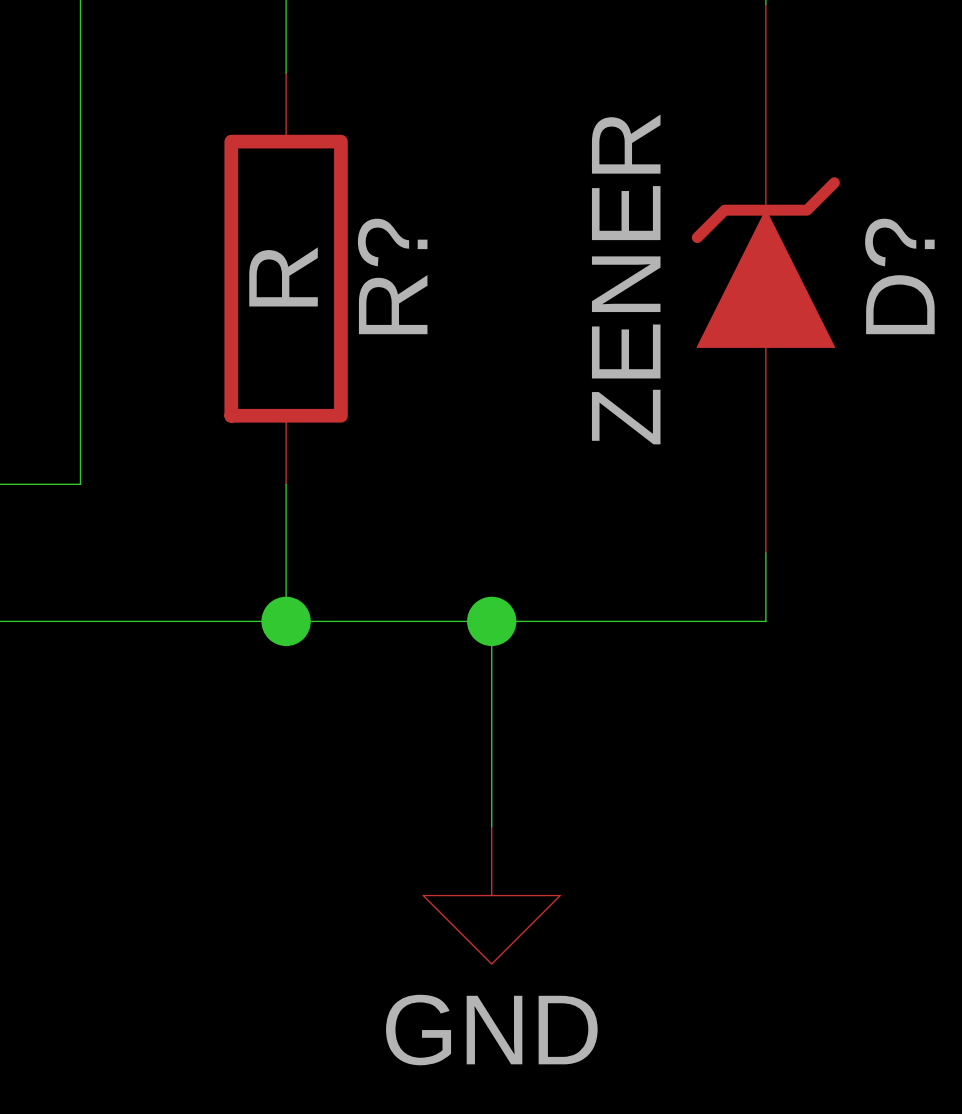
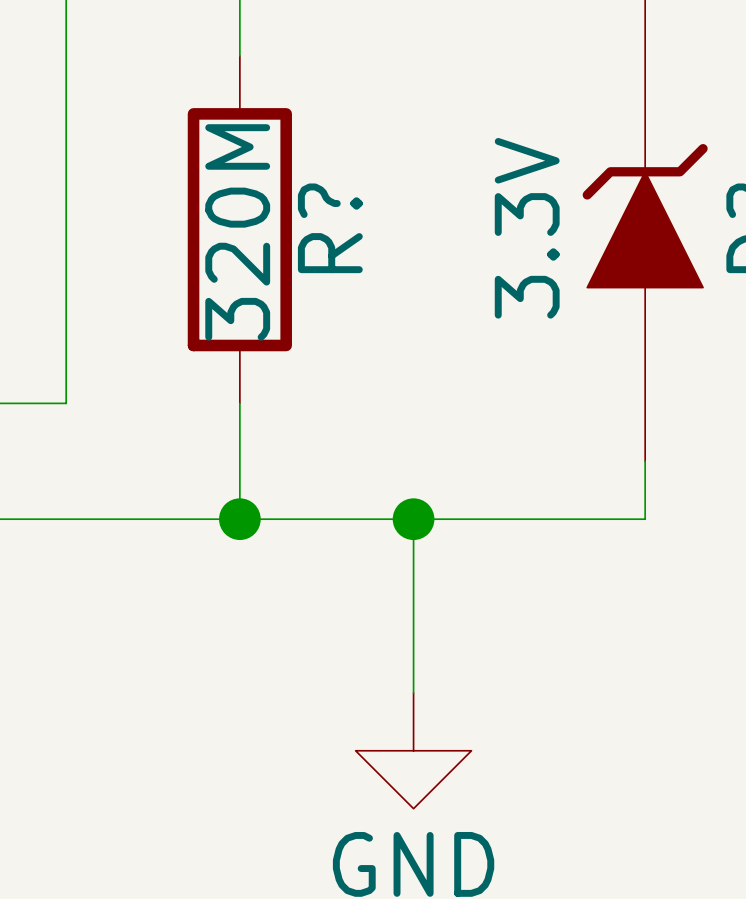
R? value: R (283, 276) -> 320M (237, 232)
D? value: ZENER (626, 279) -> 3.3V (527, 228)

